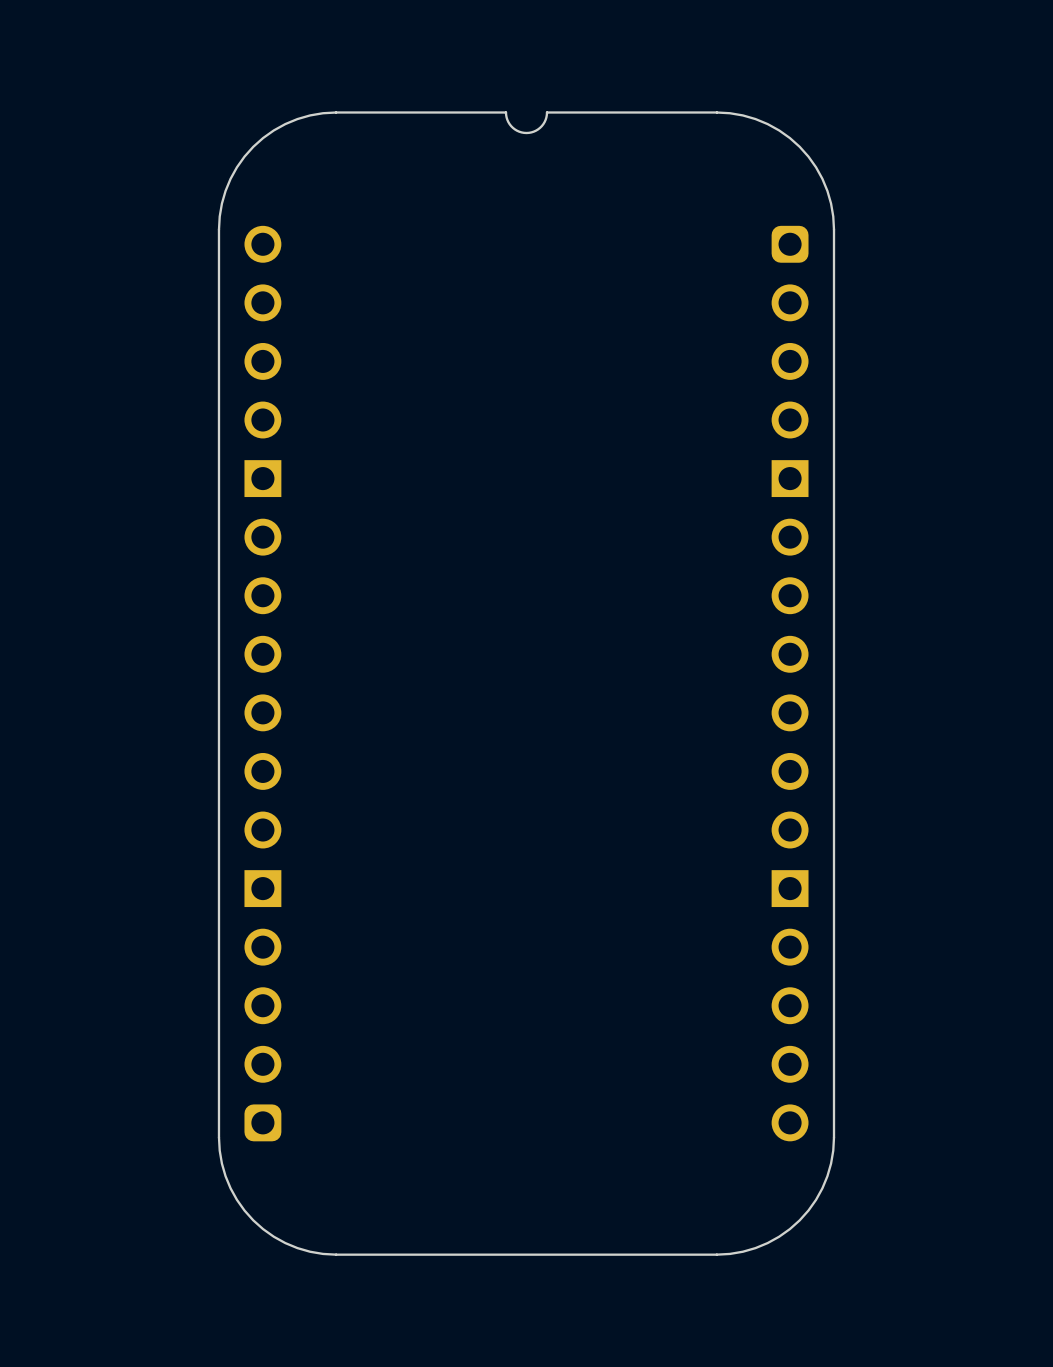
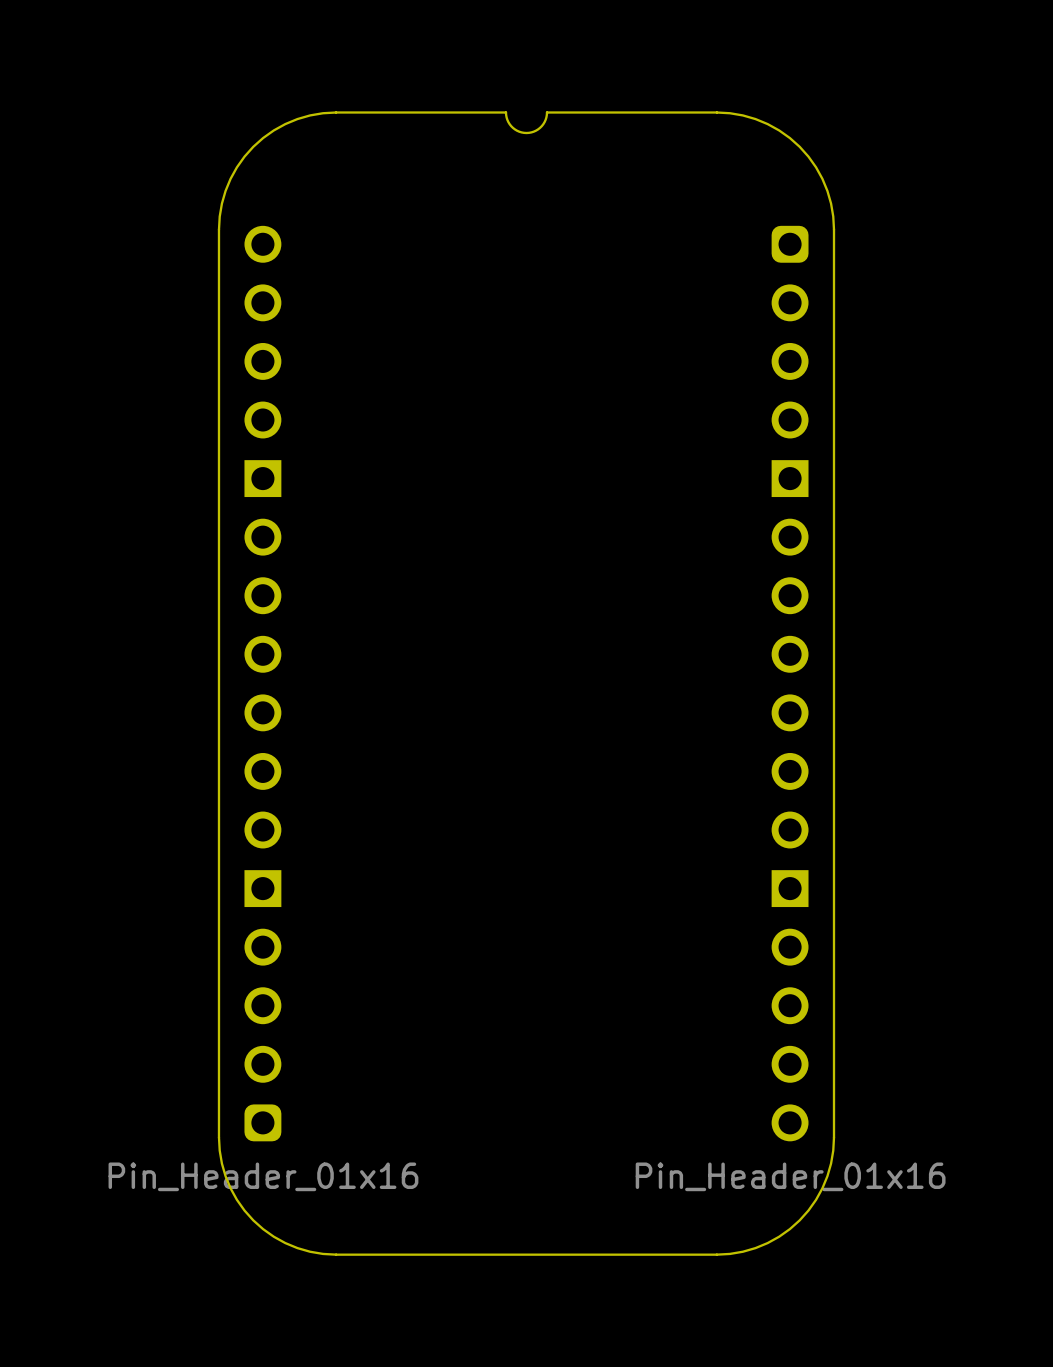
drawing: none -> [108, 1162, 419, 1192]
drawing: none -> [635, 1162, 946, 1192]

